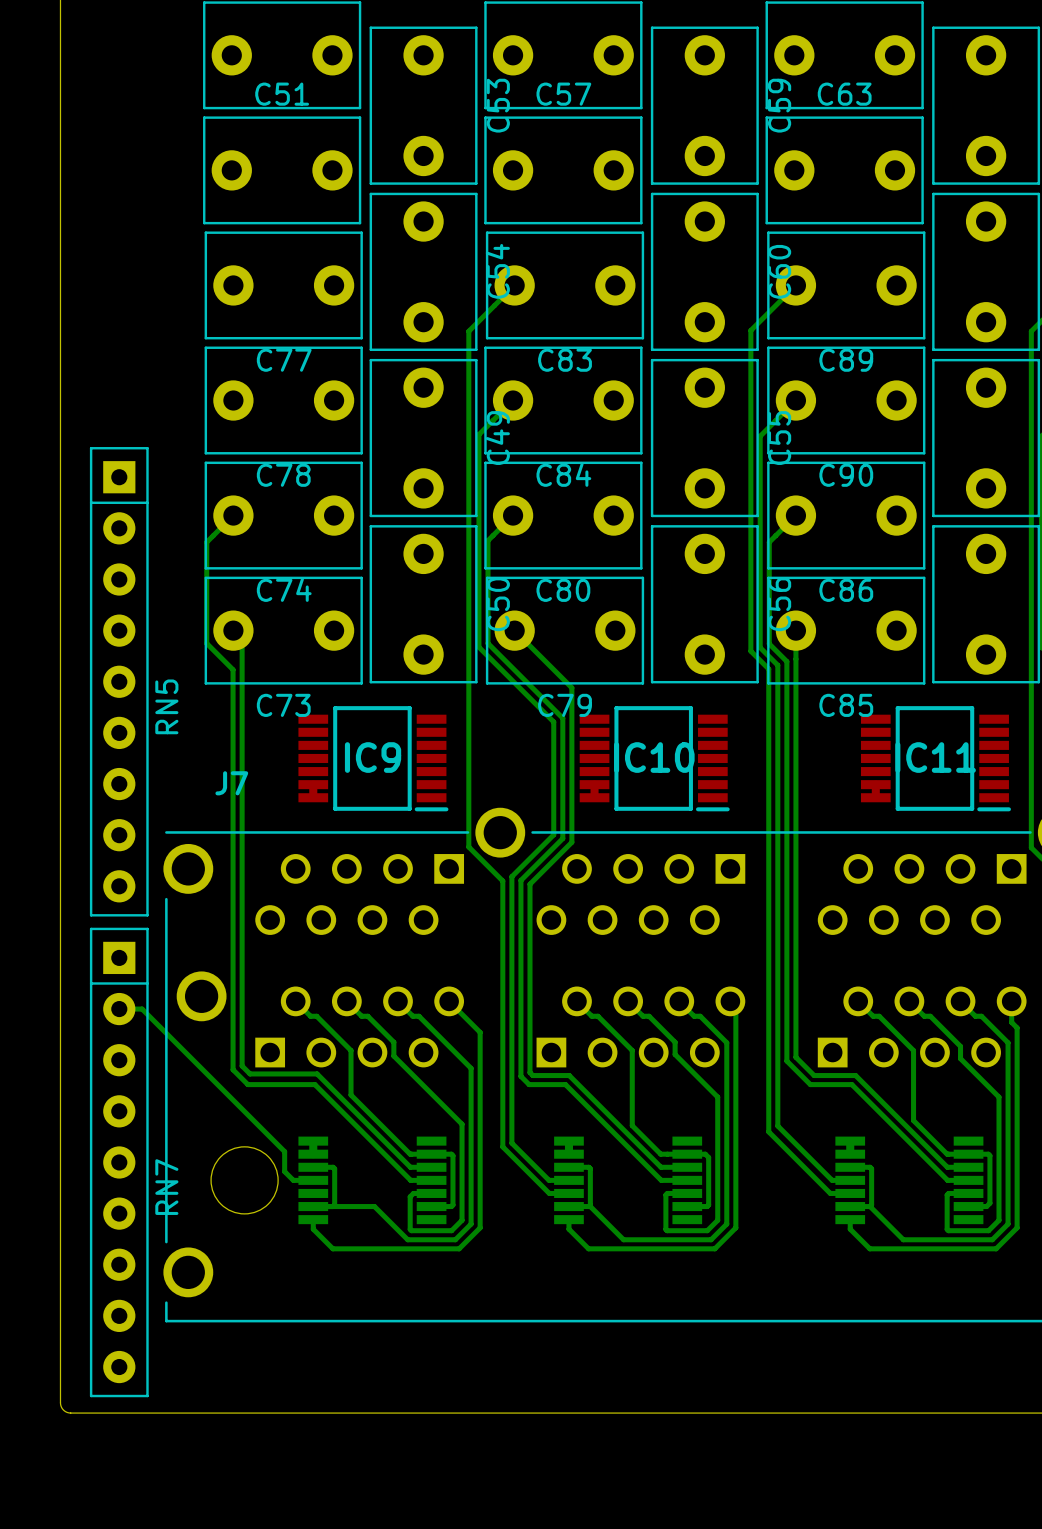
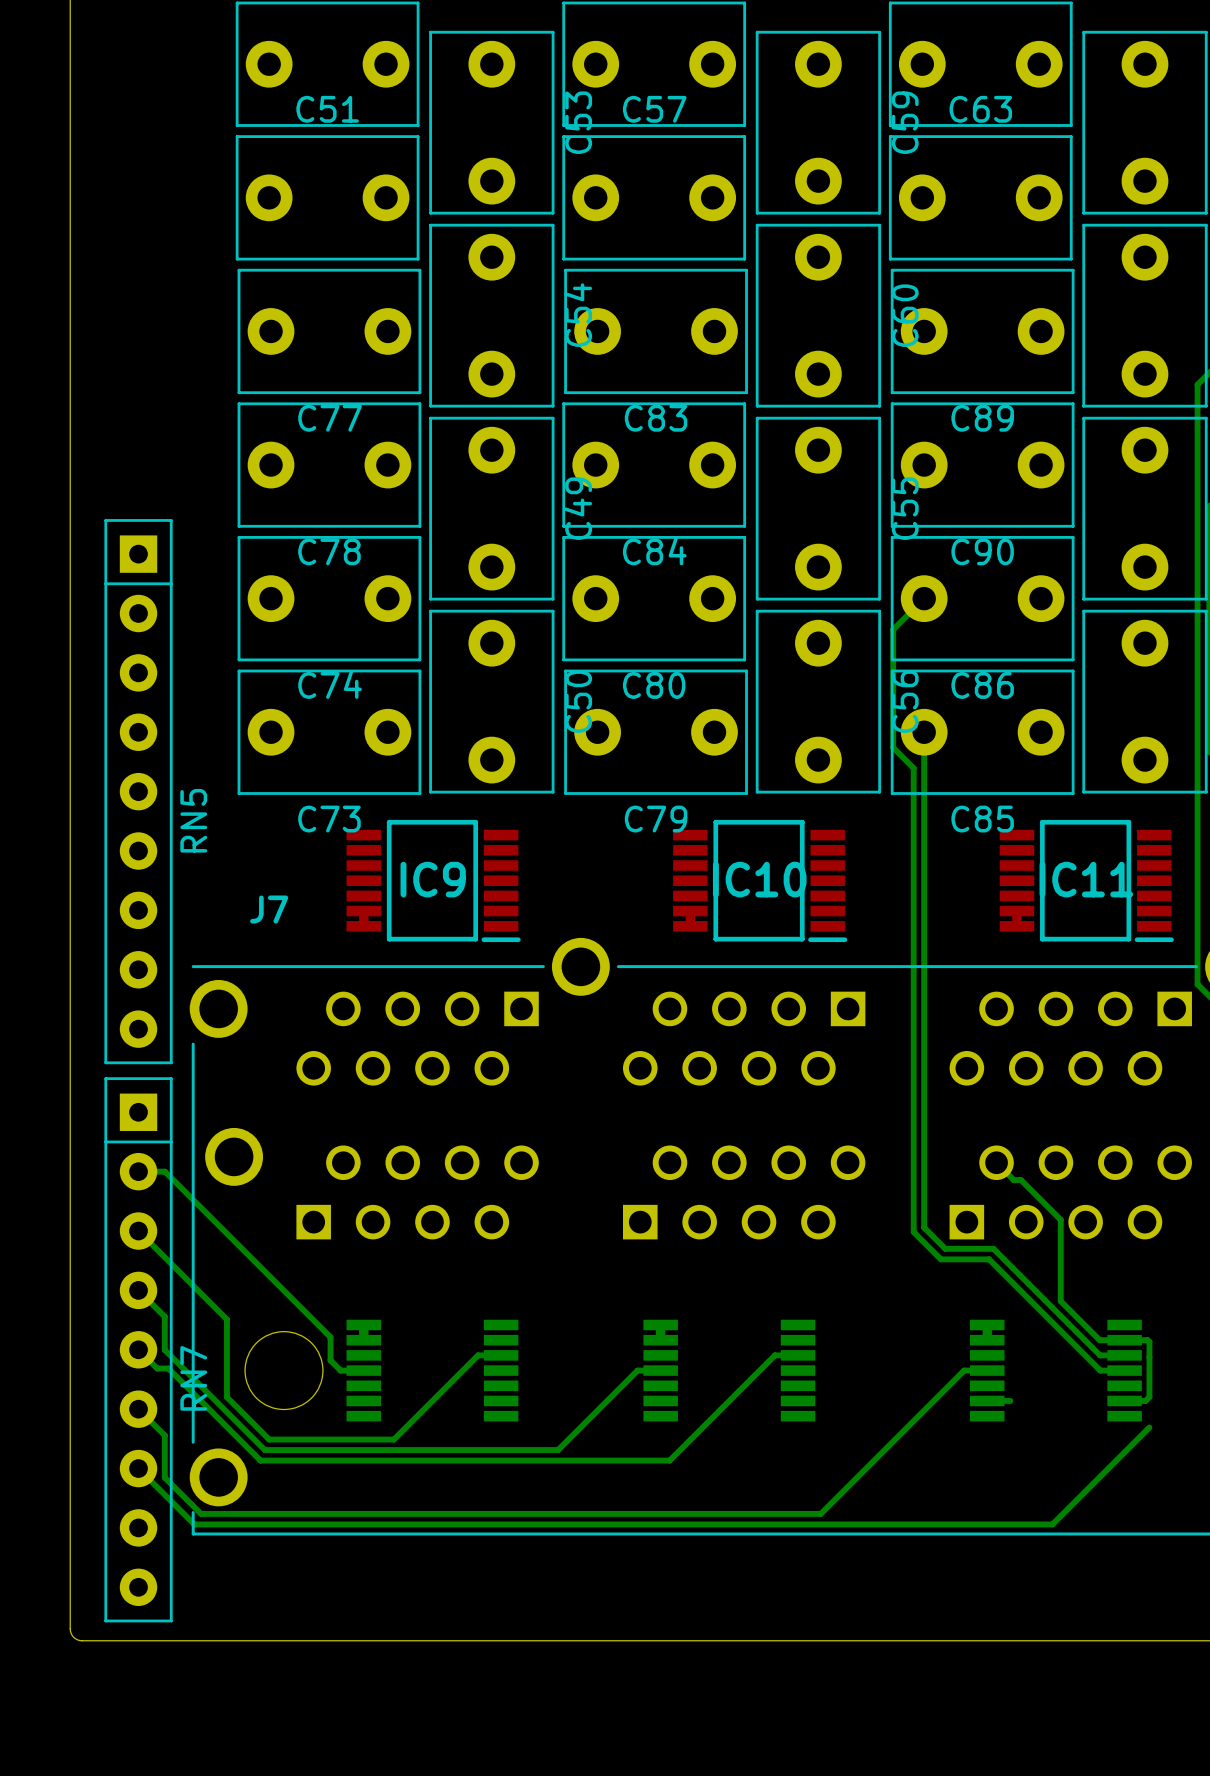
bottom track: (514, 285) (468, 331) (468, 847) (502, 881) (502, 1146) (549, 1193) (568, 1193) -> none
bottom track: (795, 285) (750, 330) (750, 651) (768, 669) (768, 1131) (830, 1193) (850, 1193) -> none
bottom track: (513, 400) (478, 434) (478, 647) (553, 722) (553, 834) (511, 876) (511, 1143) (549, 1180) -> none
bottom track: (795, 400) (760, 436) (760, 647) (777, 665) (777, 1126) (832, 1180) -> (138, 1409) (164, 1435) (164, 1477) (201, 1513) (820, 1513) (966, 1370)
bottom track: (233, 515) (206, 542) (206, 643) (233, 669) (233, 1069) (247, 1084) (314, 1084) (410, 1180) (431, 1180) -> none
bottom track: (513, 515) (488, 540) (488, 643) (562, 718) (562, 838) (520, 880) (520, 1076) (529, 1084) (565, 1084) (661, 1180) (687, 1180) -> none
bottom track: (233, 630) (242, 639) (242, 1066) (250, 1073) (317, 1073) (411, 1167) -> (138, 1231) (226, 1319) (226, 1397) (269, 1439) (393, 1439) (478, 1355)
bottom track: (514, 630) (571, 687) (571, 842) (530, 884) (530, 1072) (532, 1075) (569, 1075) (661, 1167) (667, 1167) -> (138, 1349) (157, 1368) (168, 1368) (260, 1460) (669, 1460) (774, 1355)
bottom track: (295, 1001) (310, 1016) (316, 1016) (351, 1050) (351, 1095) (410, 1154) (452, 1155) (452, 1205) (431, 1206) -> none
bottom track: (346, 1001) (361, 1016) (367, 1016) (393, 1042) (393, 1056) (462, 1124) (462, 1220) (451, 1230) (410, 1229) (410, 1196) (413, 1193) (431, 1193) -> none
bottom track: (398, 1001) (412, 1016) (419, 1016) (471, 1068) (471, 1224) (455, 1239) (407, 1239) (374, 1206) (313, 1206) -> none
bottom track: (449, 1001) (480, 1032) (480, 1227) (459, 1248) -> (637, 1370) (558, 1450) (533, 1450)
bottom track: (576, 1001) (591, 1016) (598, 1016) (632, 1050) (632, 1125) (660, 1154) (705, 1154) (708, 1157) (708, 1205) (687, 1206) -> none
bottom track: (628, 1001) (643, 1016) (649, 1016) (675, 1042) (675, 1054) (717, 1097) (717, 1220) (707, 1230) (665, 1229) (665, 1194) (687, 1193) -> none
bottom track: (679, 1001) (694, 1016) (700, 1016) (726, 1042) (726, 1224) (711, 1239) (623, 1239) (590, 1206) (568, 1206) -> none
bottom track: (730, 1001) (735, 1006) (735, 1227) (714, 1248) (588, 1248) (568, 1229) (568, 1219) -> none
bottom track: (909, 1001) (924, 1016) (930, 1016) (960, 1046) (960, 1058) (998, 1097) (998, 1220) (989, 1229) -> none
bottom track: (960, 1001) (975, 1016) (981, 1016) (1008, 1042) (1008, 1224) (992, 1239) (903, 1239) (870, 1206) (871, 1168) (850, 1167) -> none
bottom track: (1011, 1001) (1011, 1022) (1017, 1027) (1017, 1227) (996, 1248) (869, 1248) (850, 1229) (850, 1219) -> none
bottom track: (313, 1167) (334, 1168) (333, 1206) -> none
bottom track: (568, 1167) (590, 1168) (588, 1206) -> none
bottom track: (968, 1193) (947, 1194) (947, 1229) (988, 1230) -> (138, 1468) (194, 1524) (1052, 1524) (1147, 1429)
bottom track: (313, 1219) (313, 1229) (332, 1248) -> (138, 1290) (164, 1316) (164, 1350) (264, 1450) (386, 1450)

